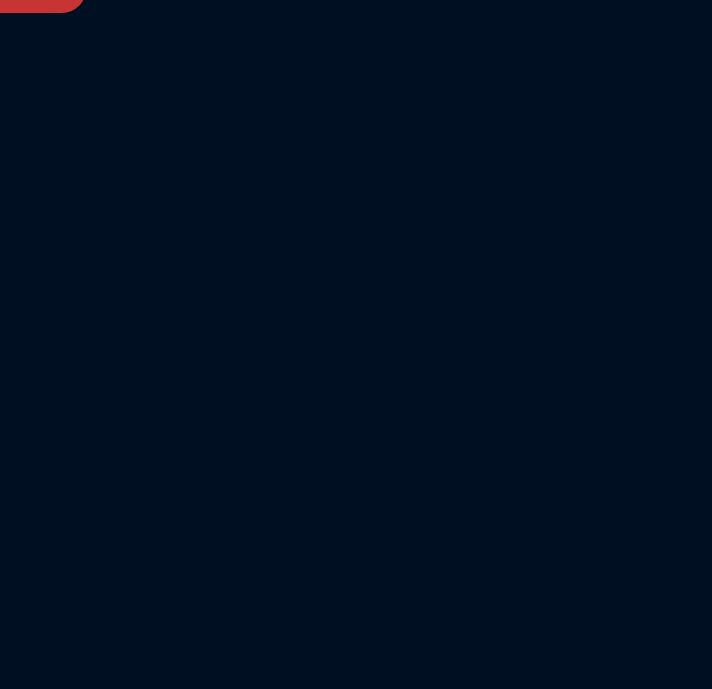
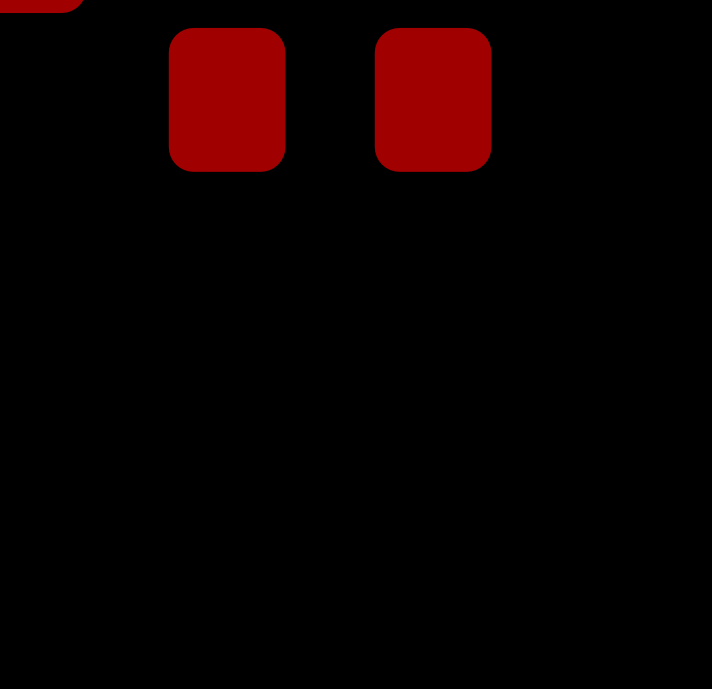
part: none -> (330, 99)

